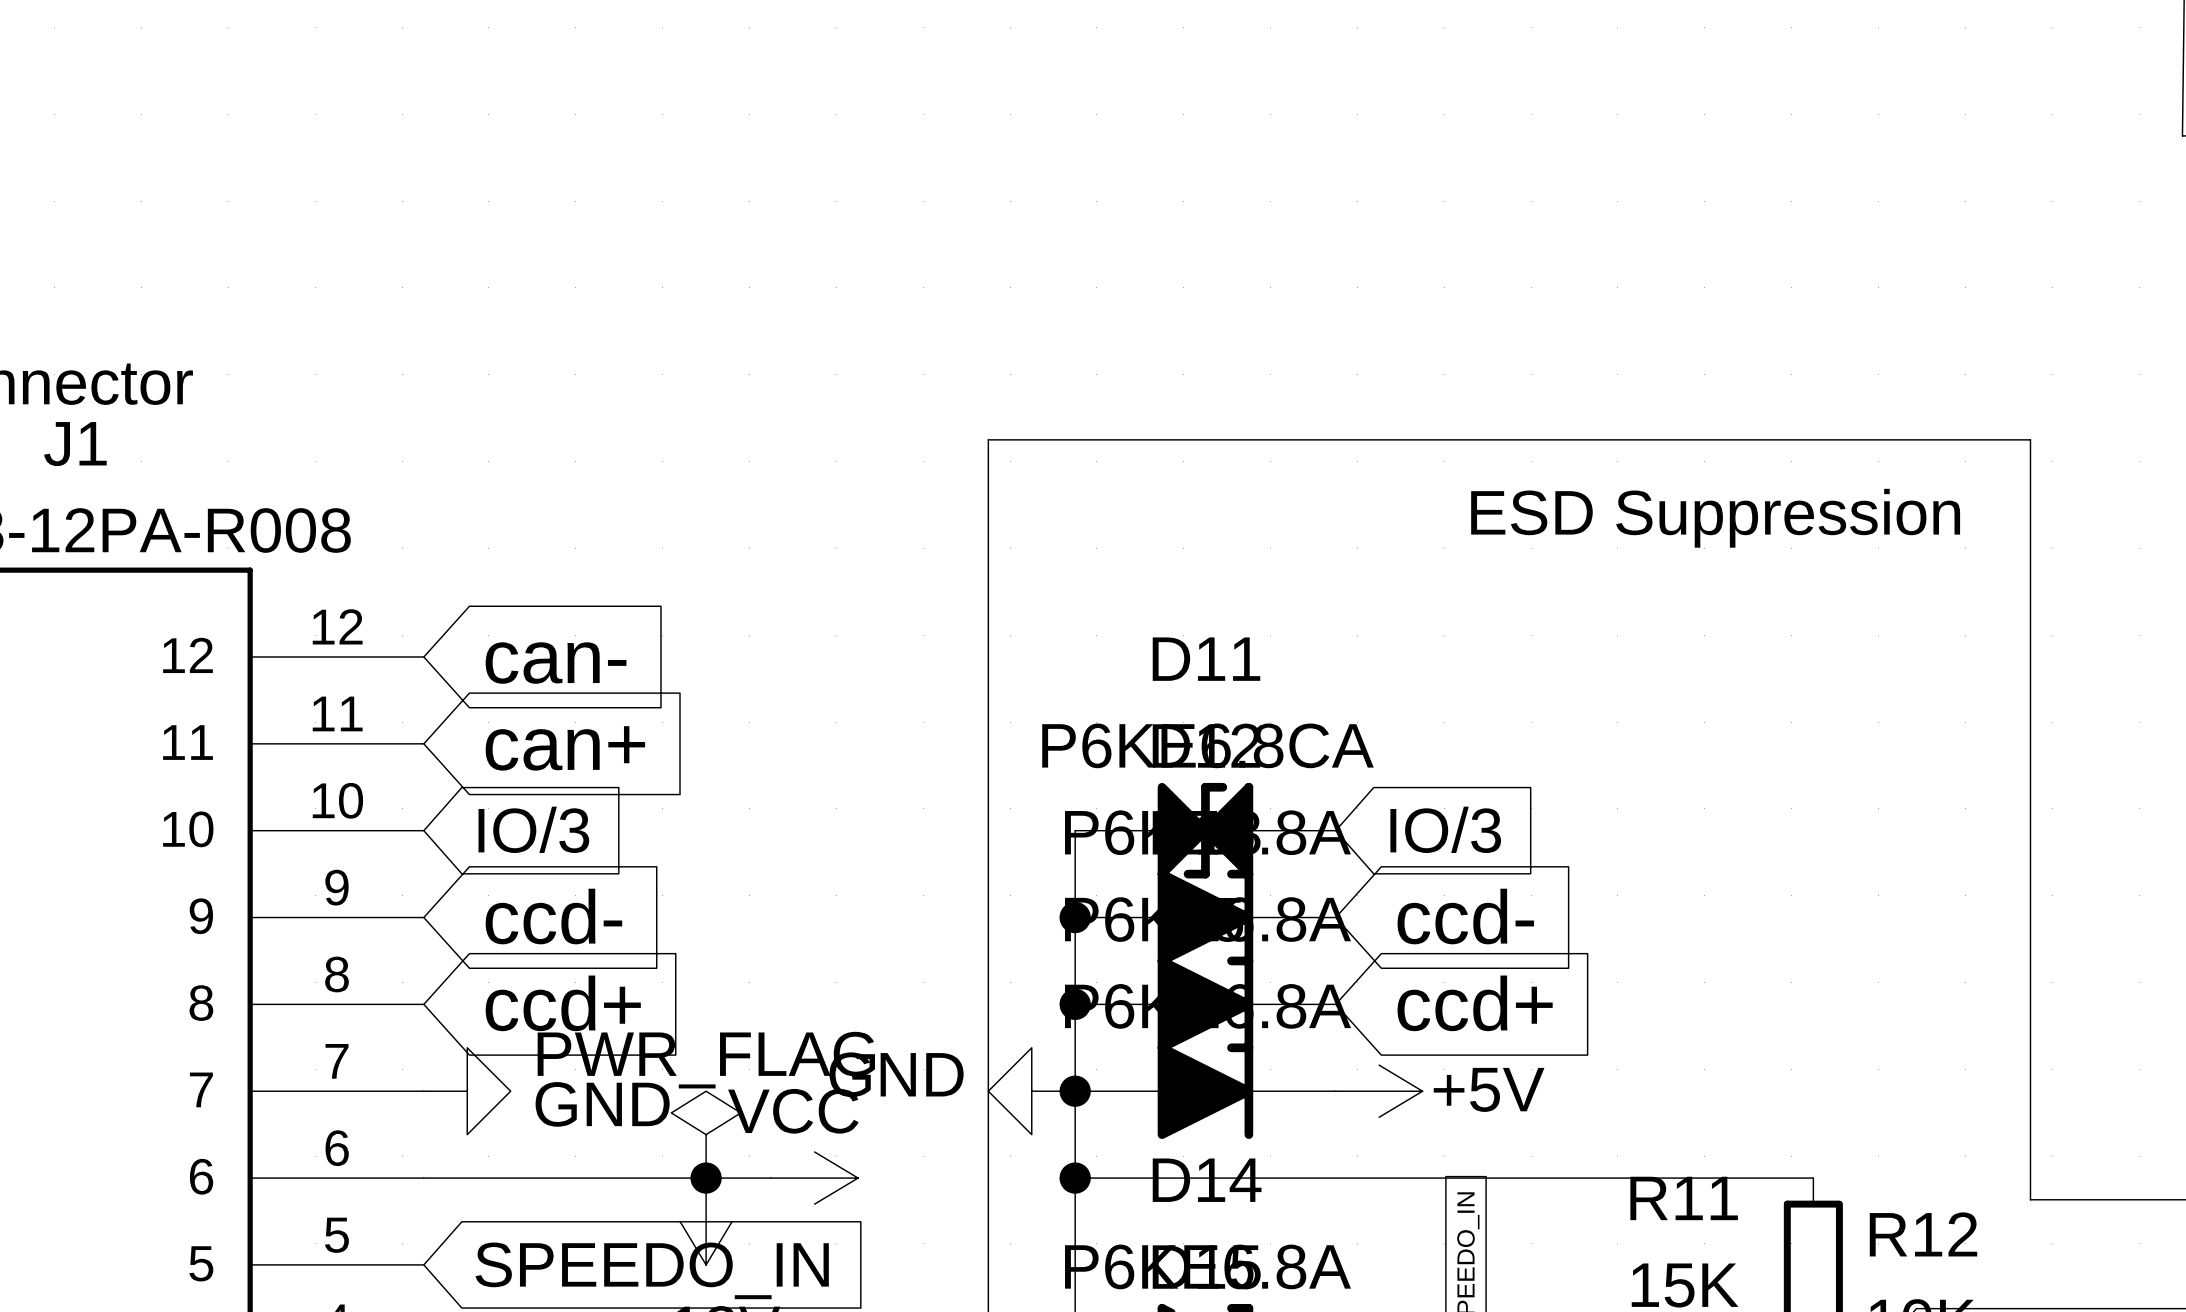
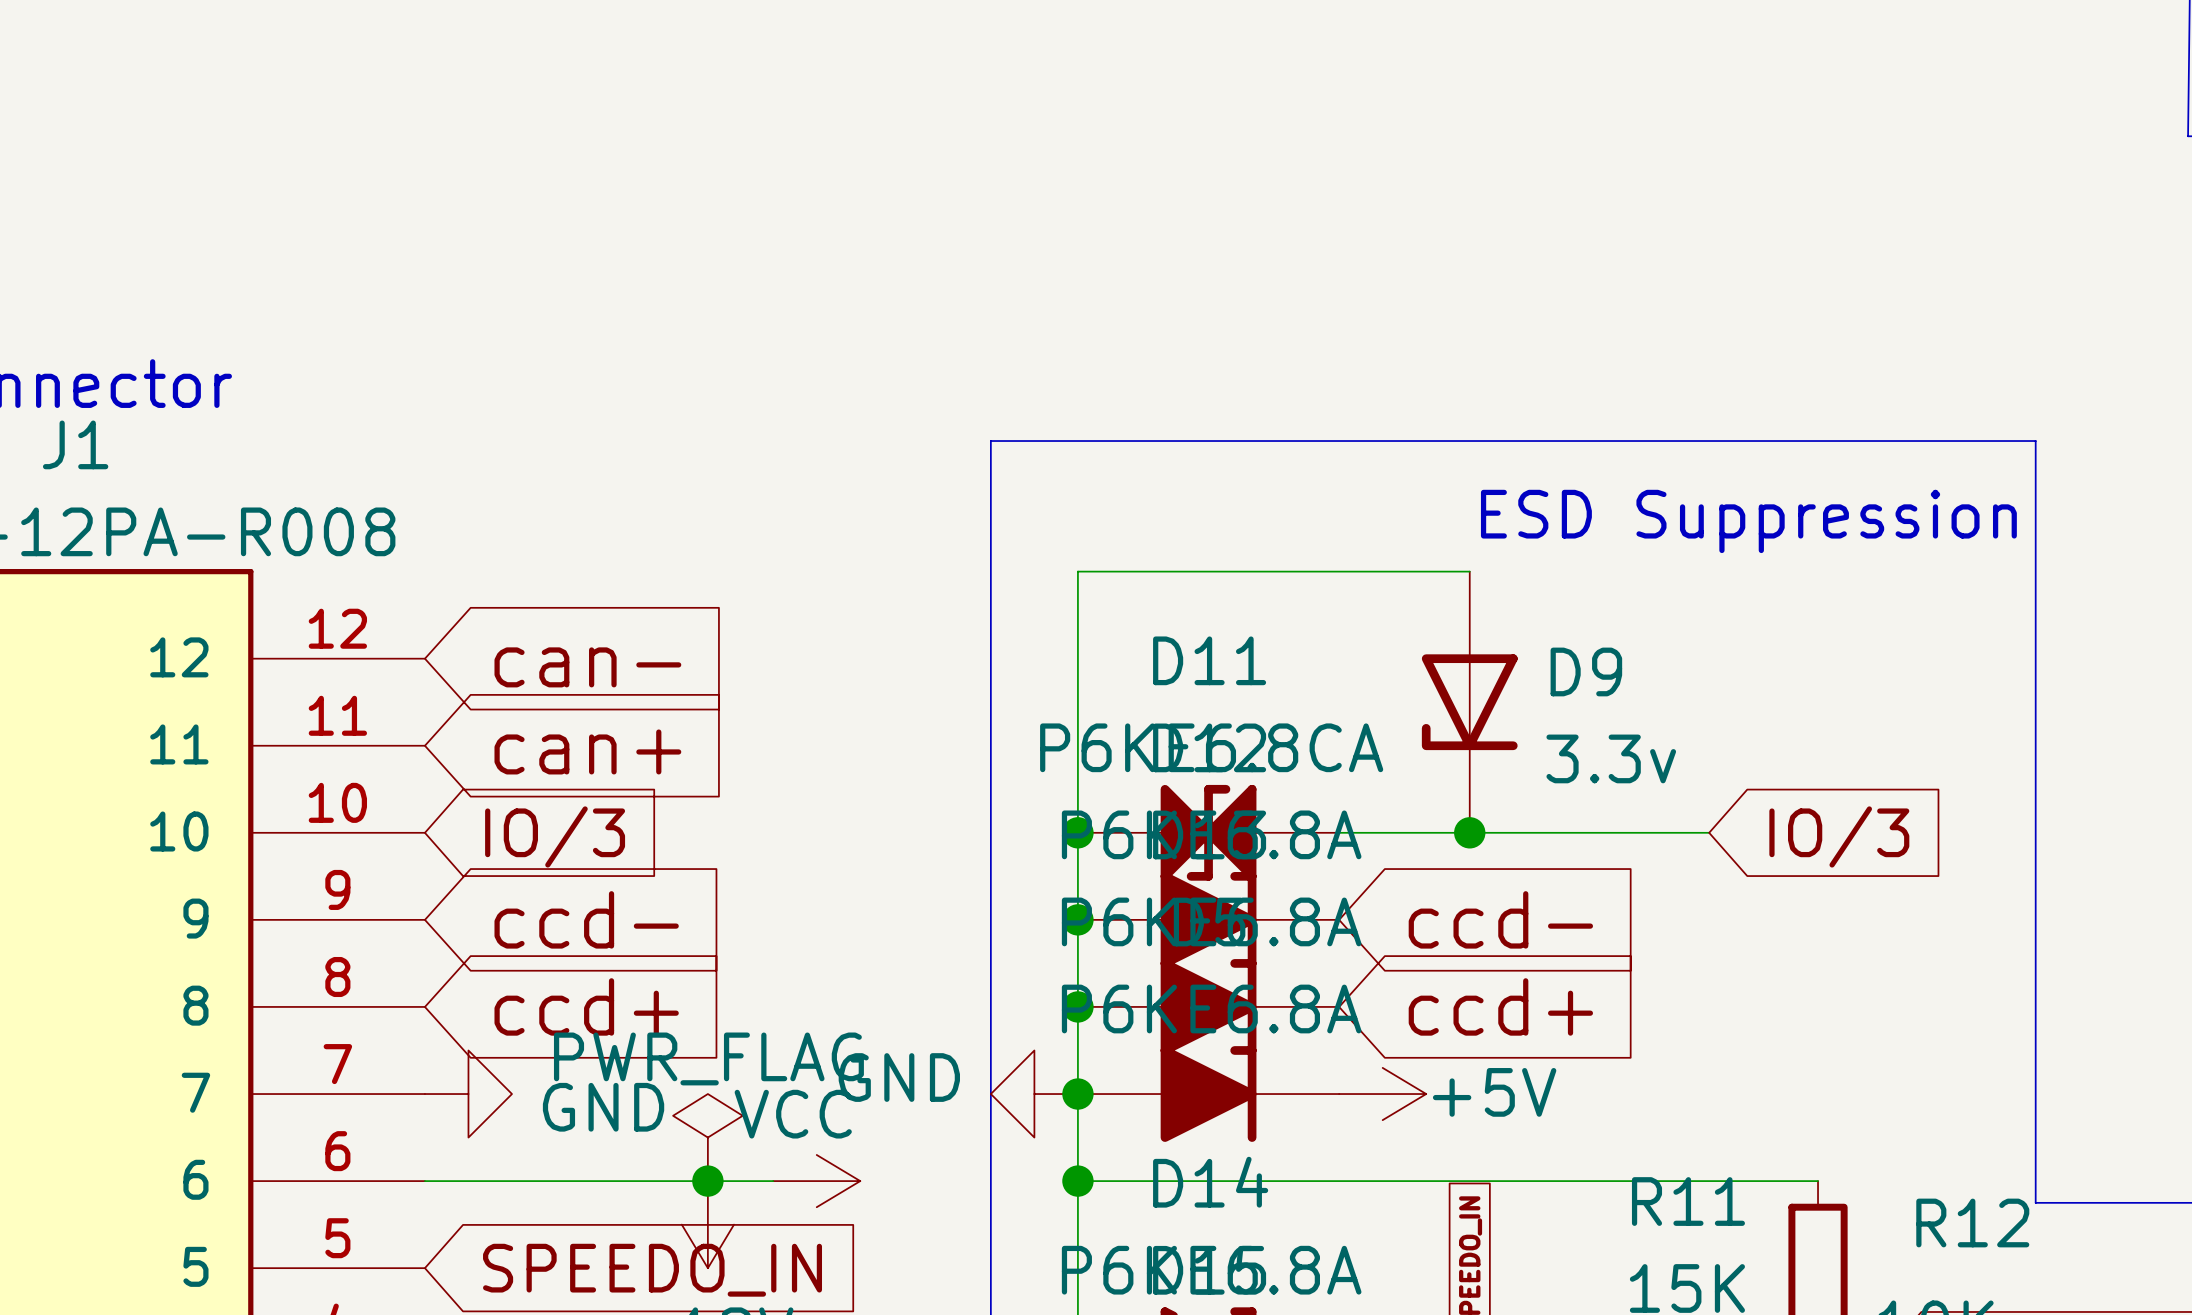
wire: none -> (1469, 571) (1077, 571) (1077, 832)
D9: none -> 3.3v (1469, 702)
global label position: IO/3 (1445, 829) -> IO/3 (1839, 836)
junction: none -> (1077, 832)
wire: none -> (1339, 832) (1709, 832)
junction: none -> (1469, 832)
R12 name position: R12 (1923, 1234) -> R12 (1972, 1222)

